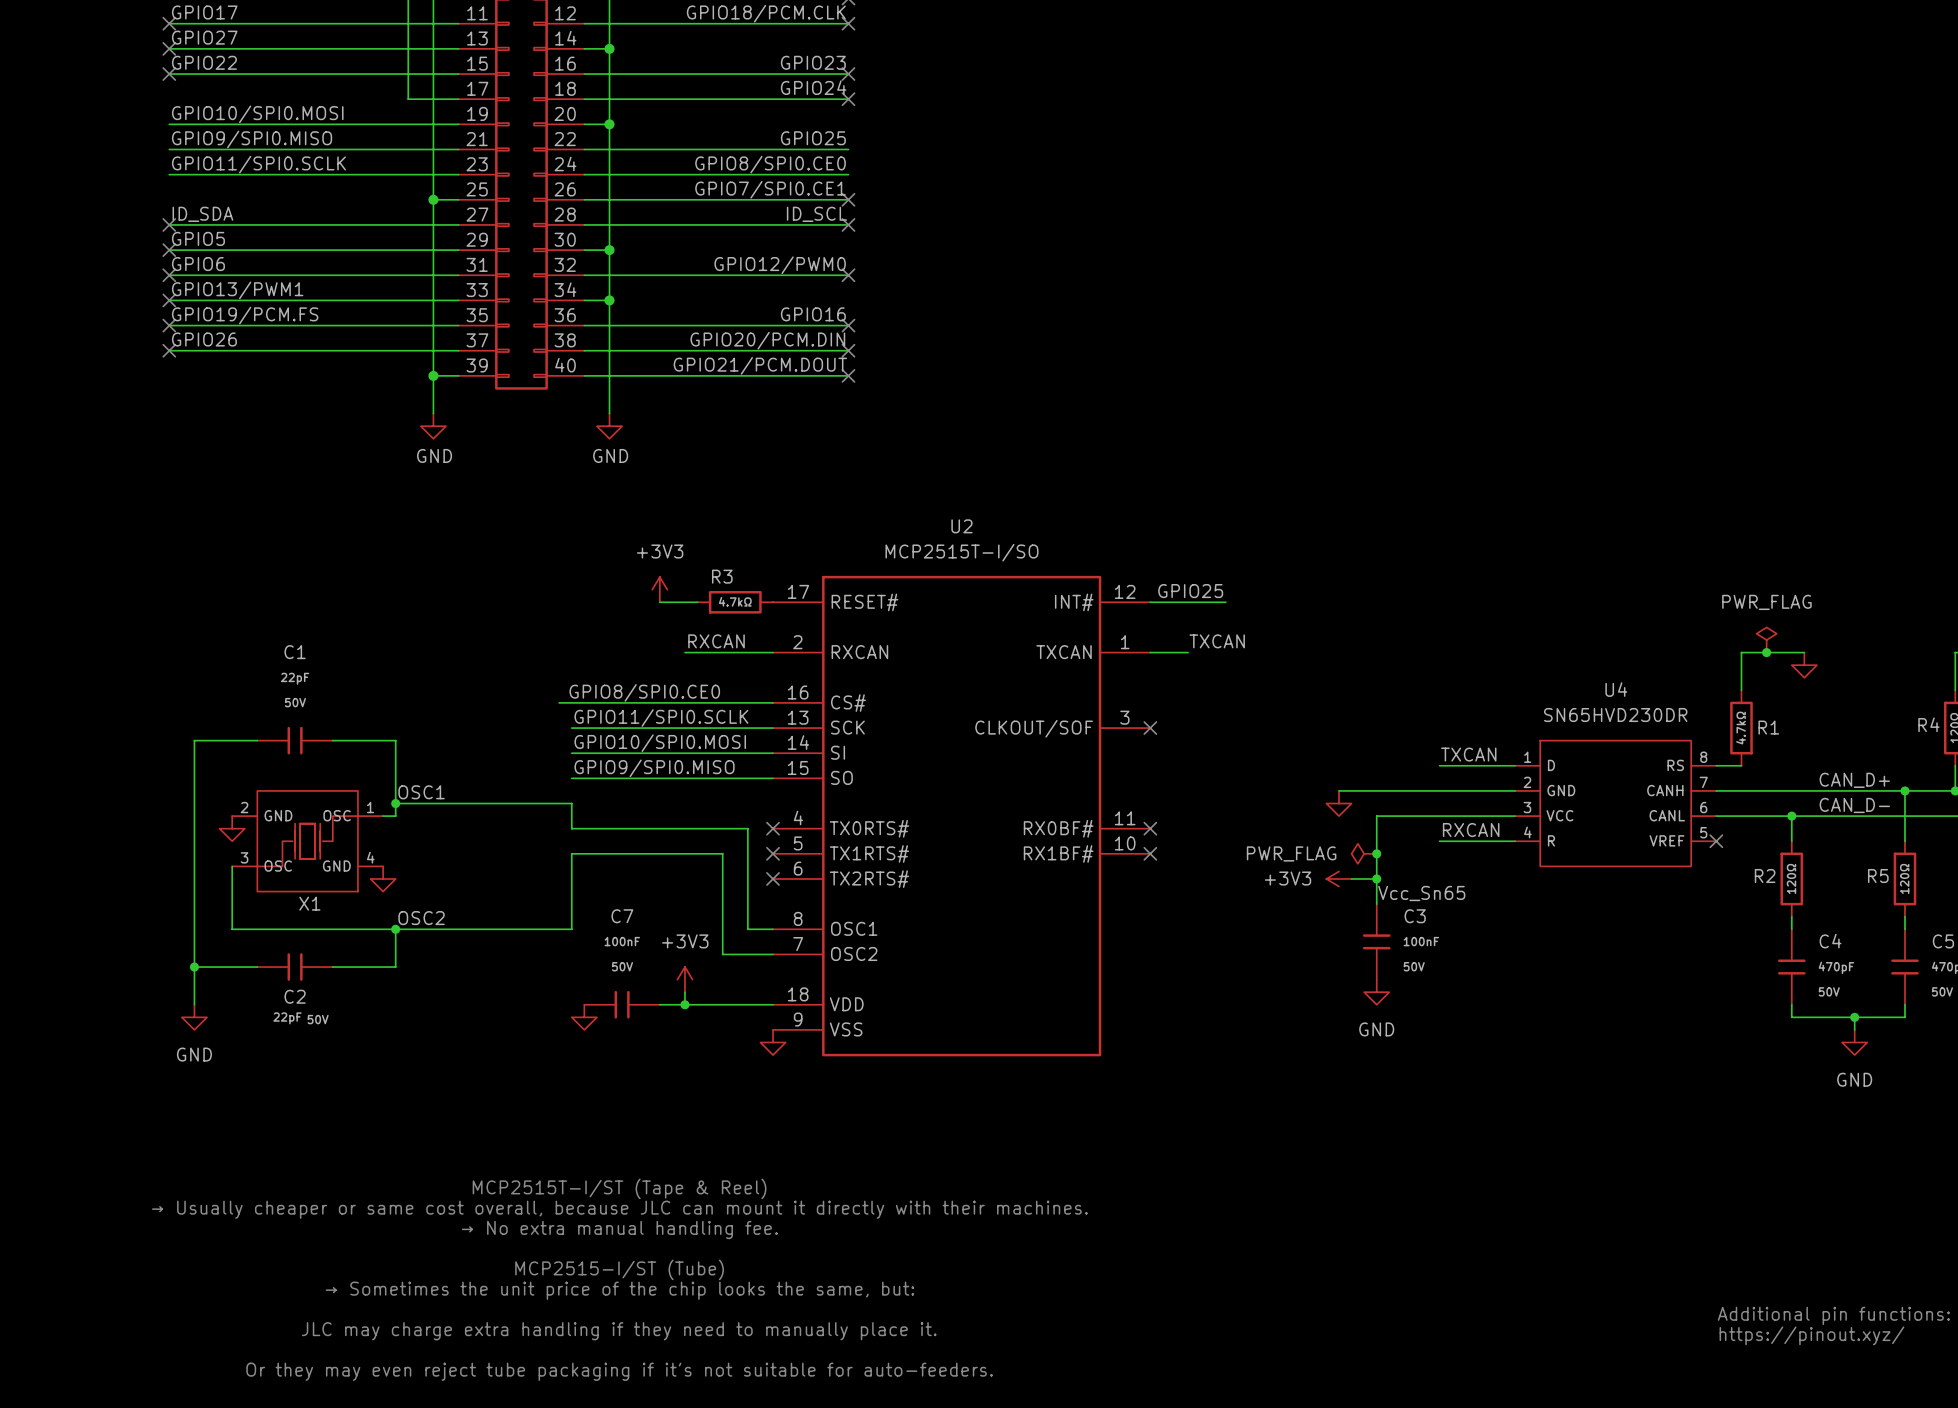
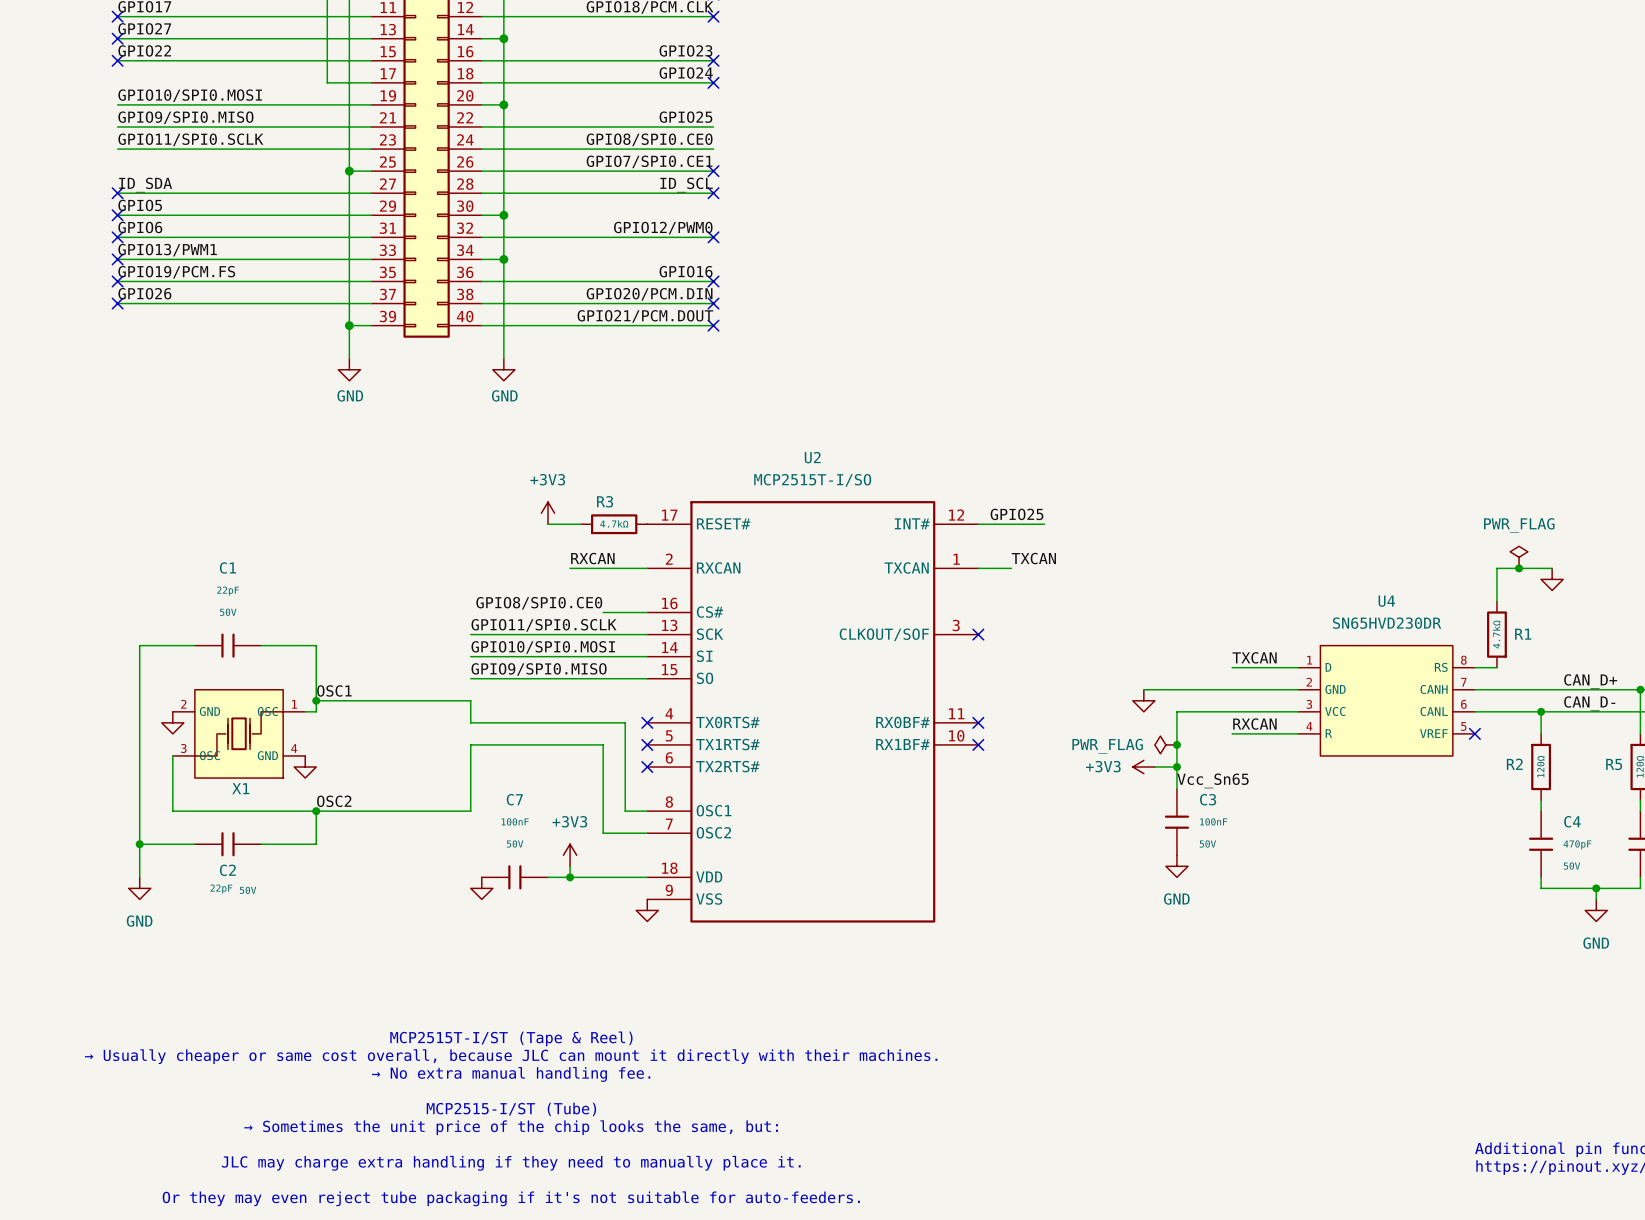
wire: (559, 702) (722, 702) -> none

